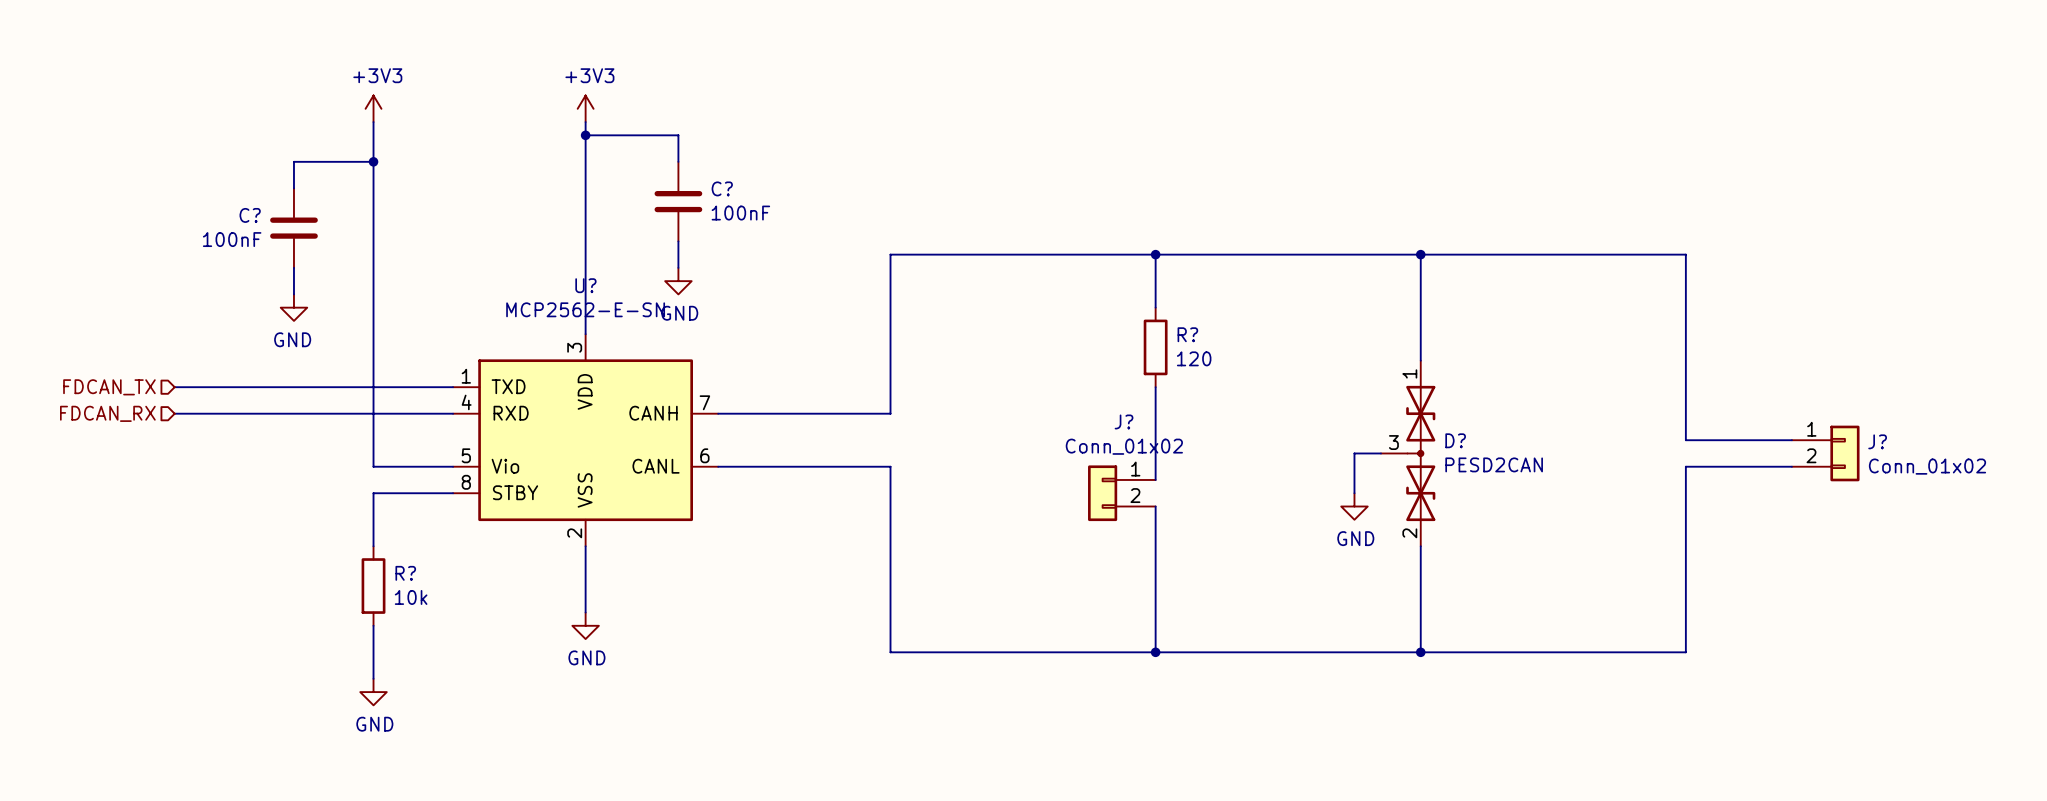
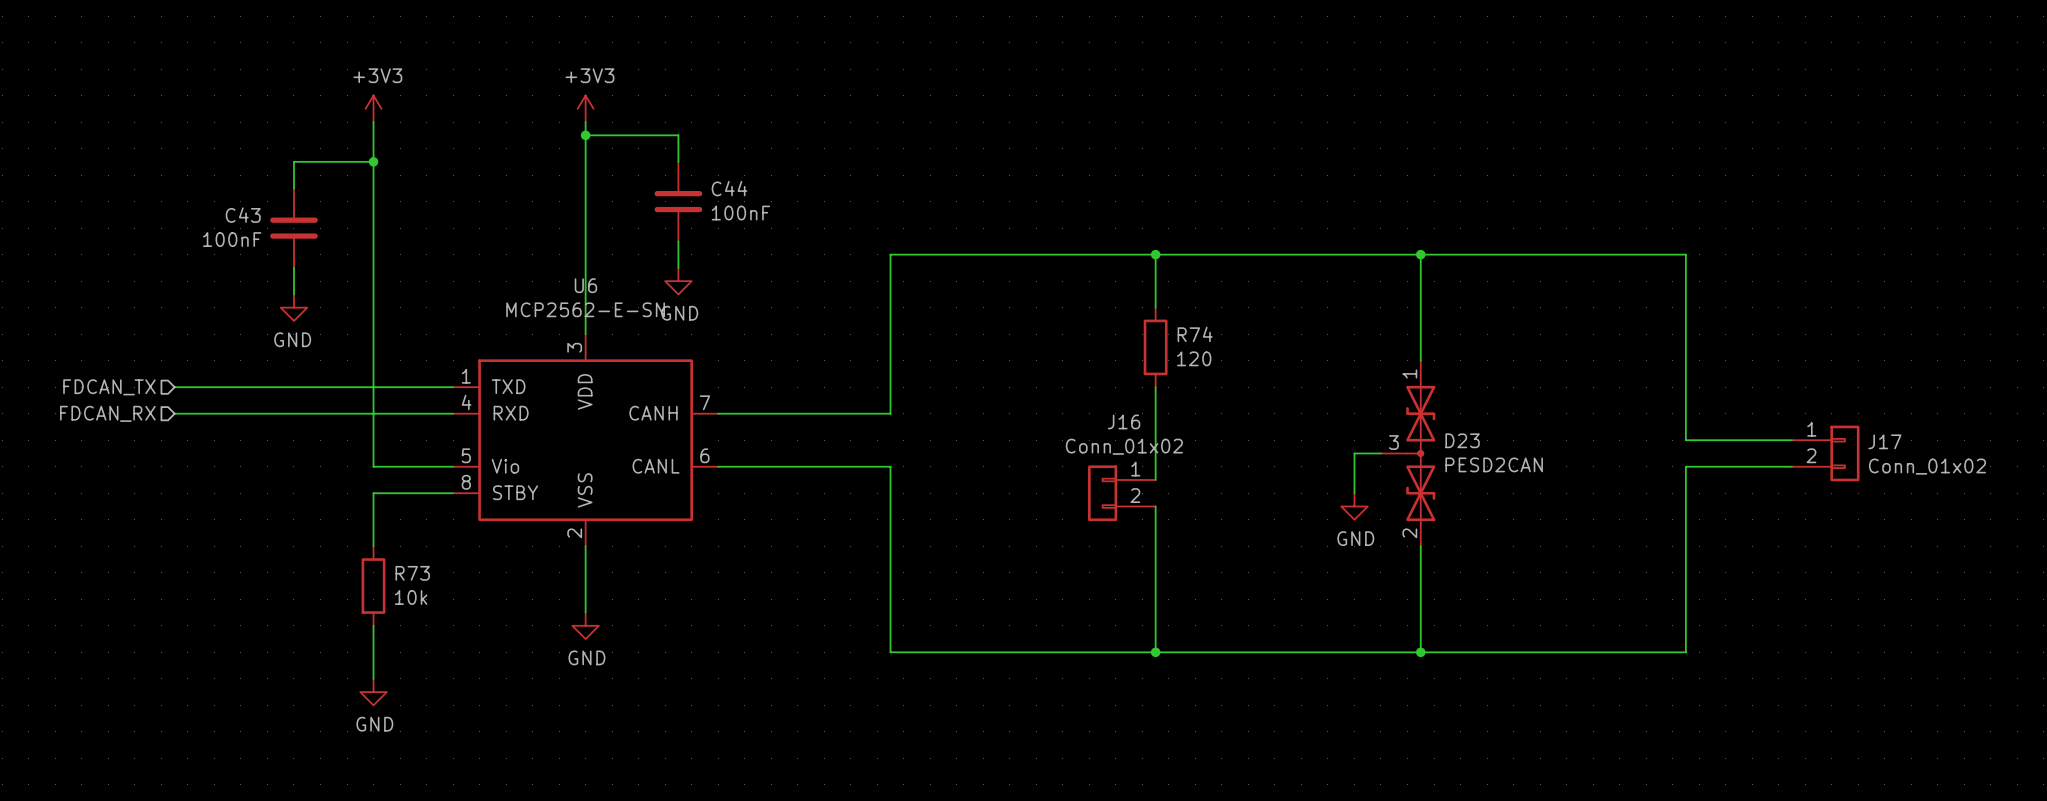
C? name: C? (722, 188) -> C44 (729, 188)
C? name: C? (250, 215) -> C43 (243, 215)
U? name: U? (585, 285) -> U6 (585, 285)
R? name: R? (1187, 334) -> R74 (1195, 334)
J? name: J? (1124, 421) -> J16 (1124, 421)
D? name: D? (1455, 440) -> D23 (1462, 440)
J? name: J? (1877, 441) -> J17 (1884, 441)
R? name: R? (405, 573) -> R73 (412, 573)

